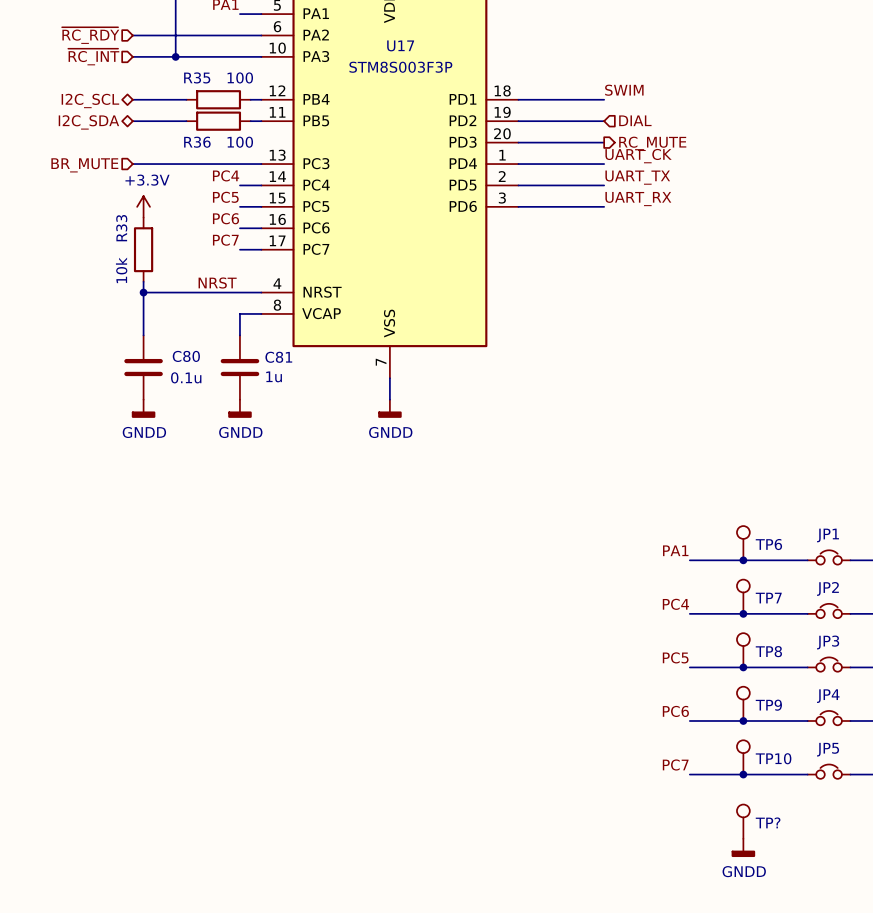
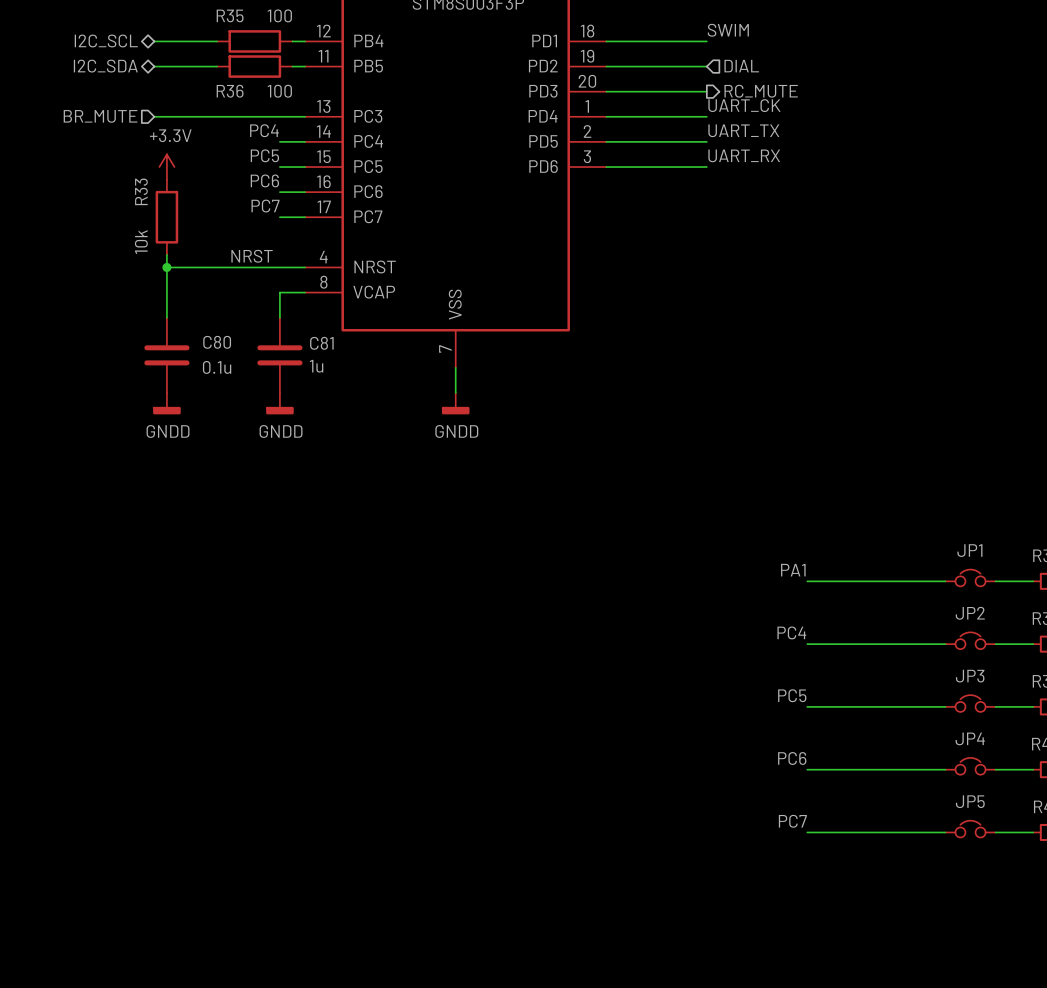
TP6: (743, 543) -> none
junction: (743, 560) -> none
TP7: (743, 596) -> none
junction: (743, 613) -> none
TP8: (743, 650) -> none
junction: (743, 667) -> none
TP9: (743, 703) -> none
junction: (743, 720) -> none
TP10: (743, 757) -> none
junction: (743, 774) -> none
TP?: (743, 821) -> none
power symbol: GNDD (743, 847) -> none

